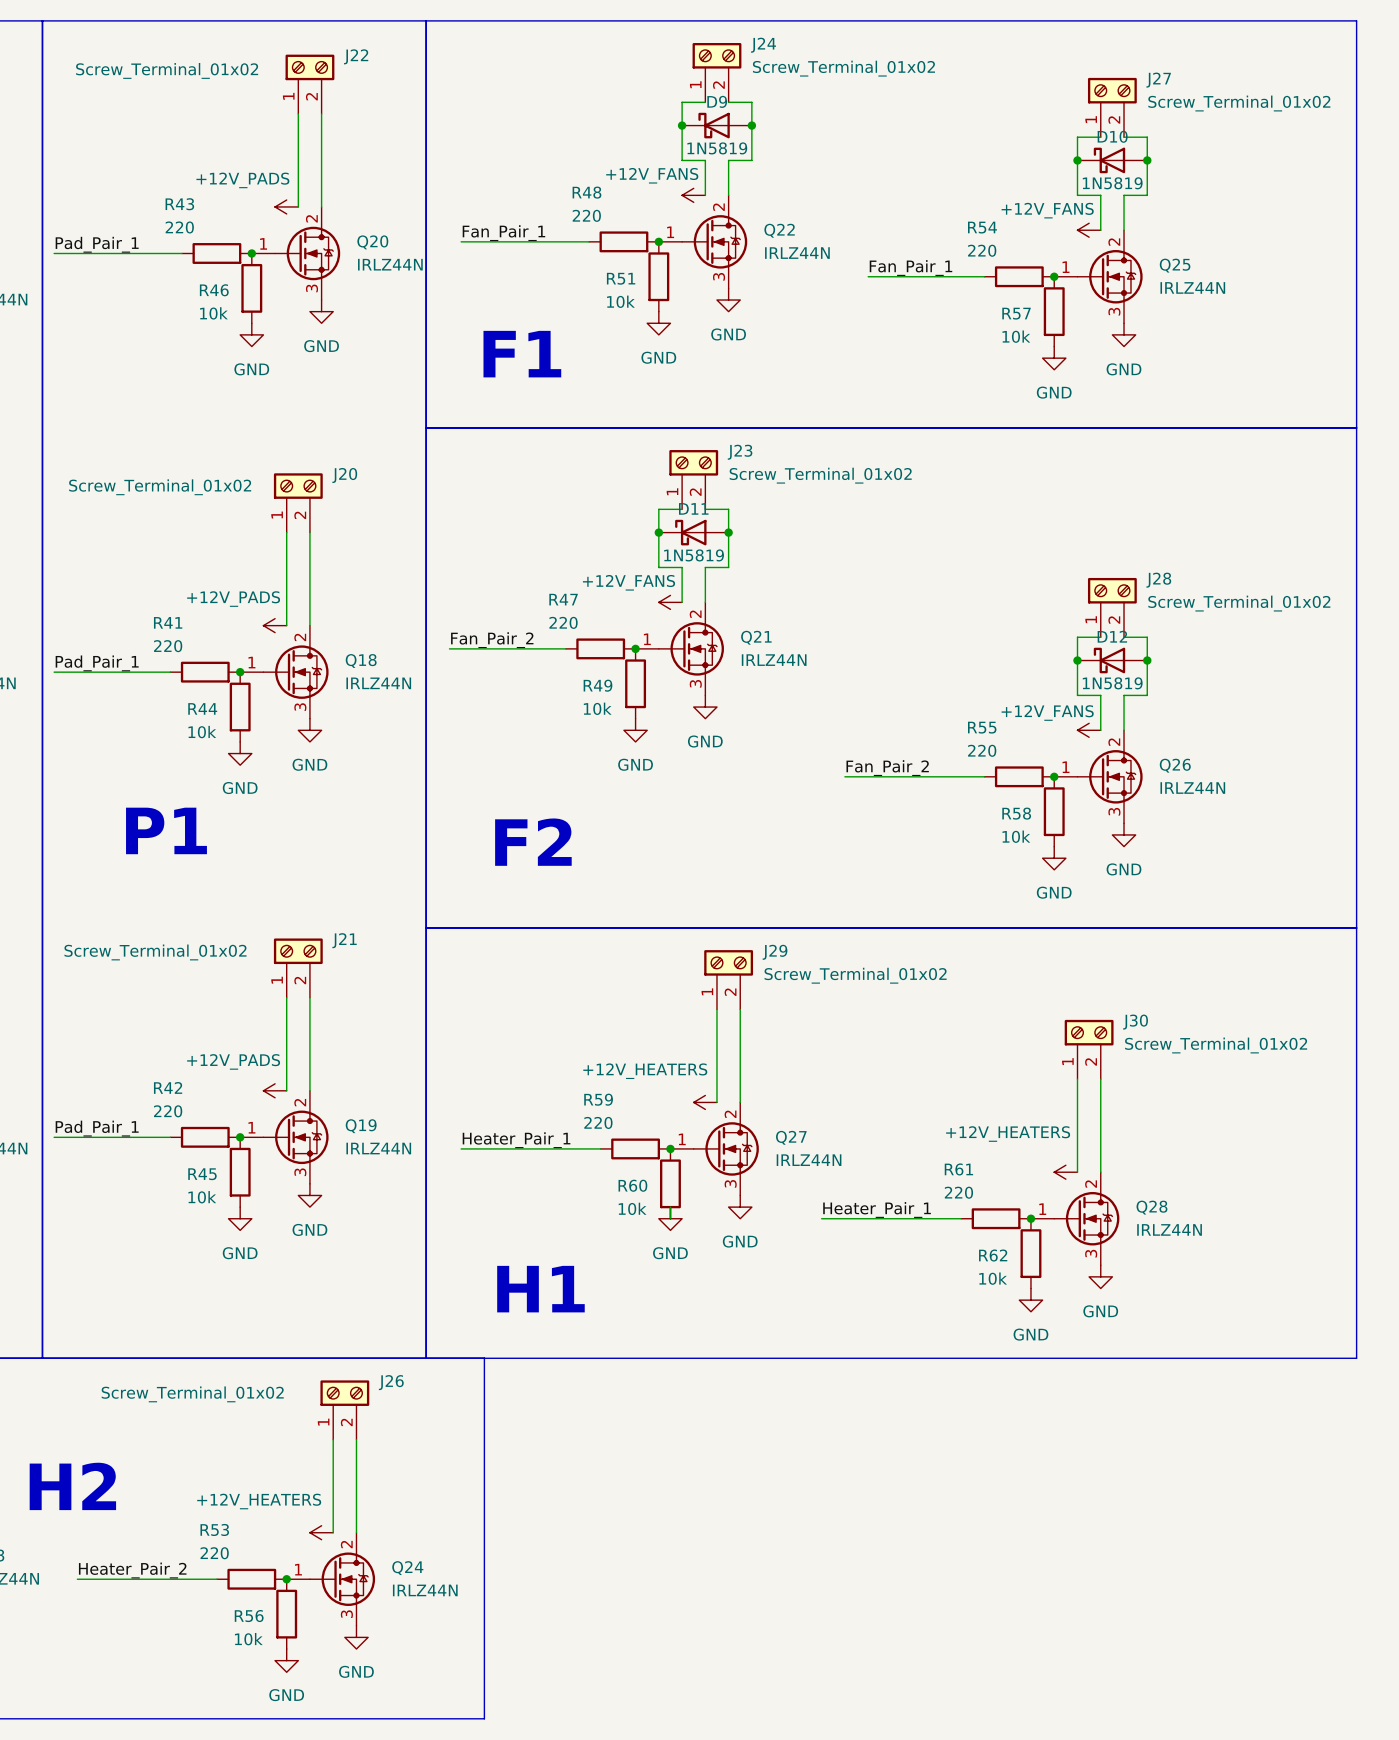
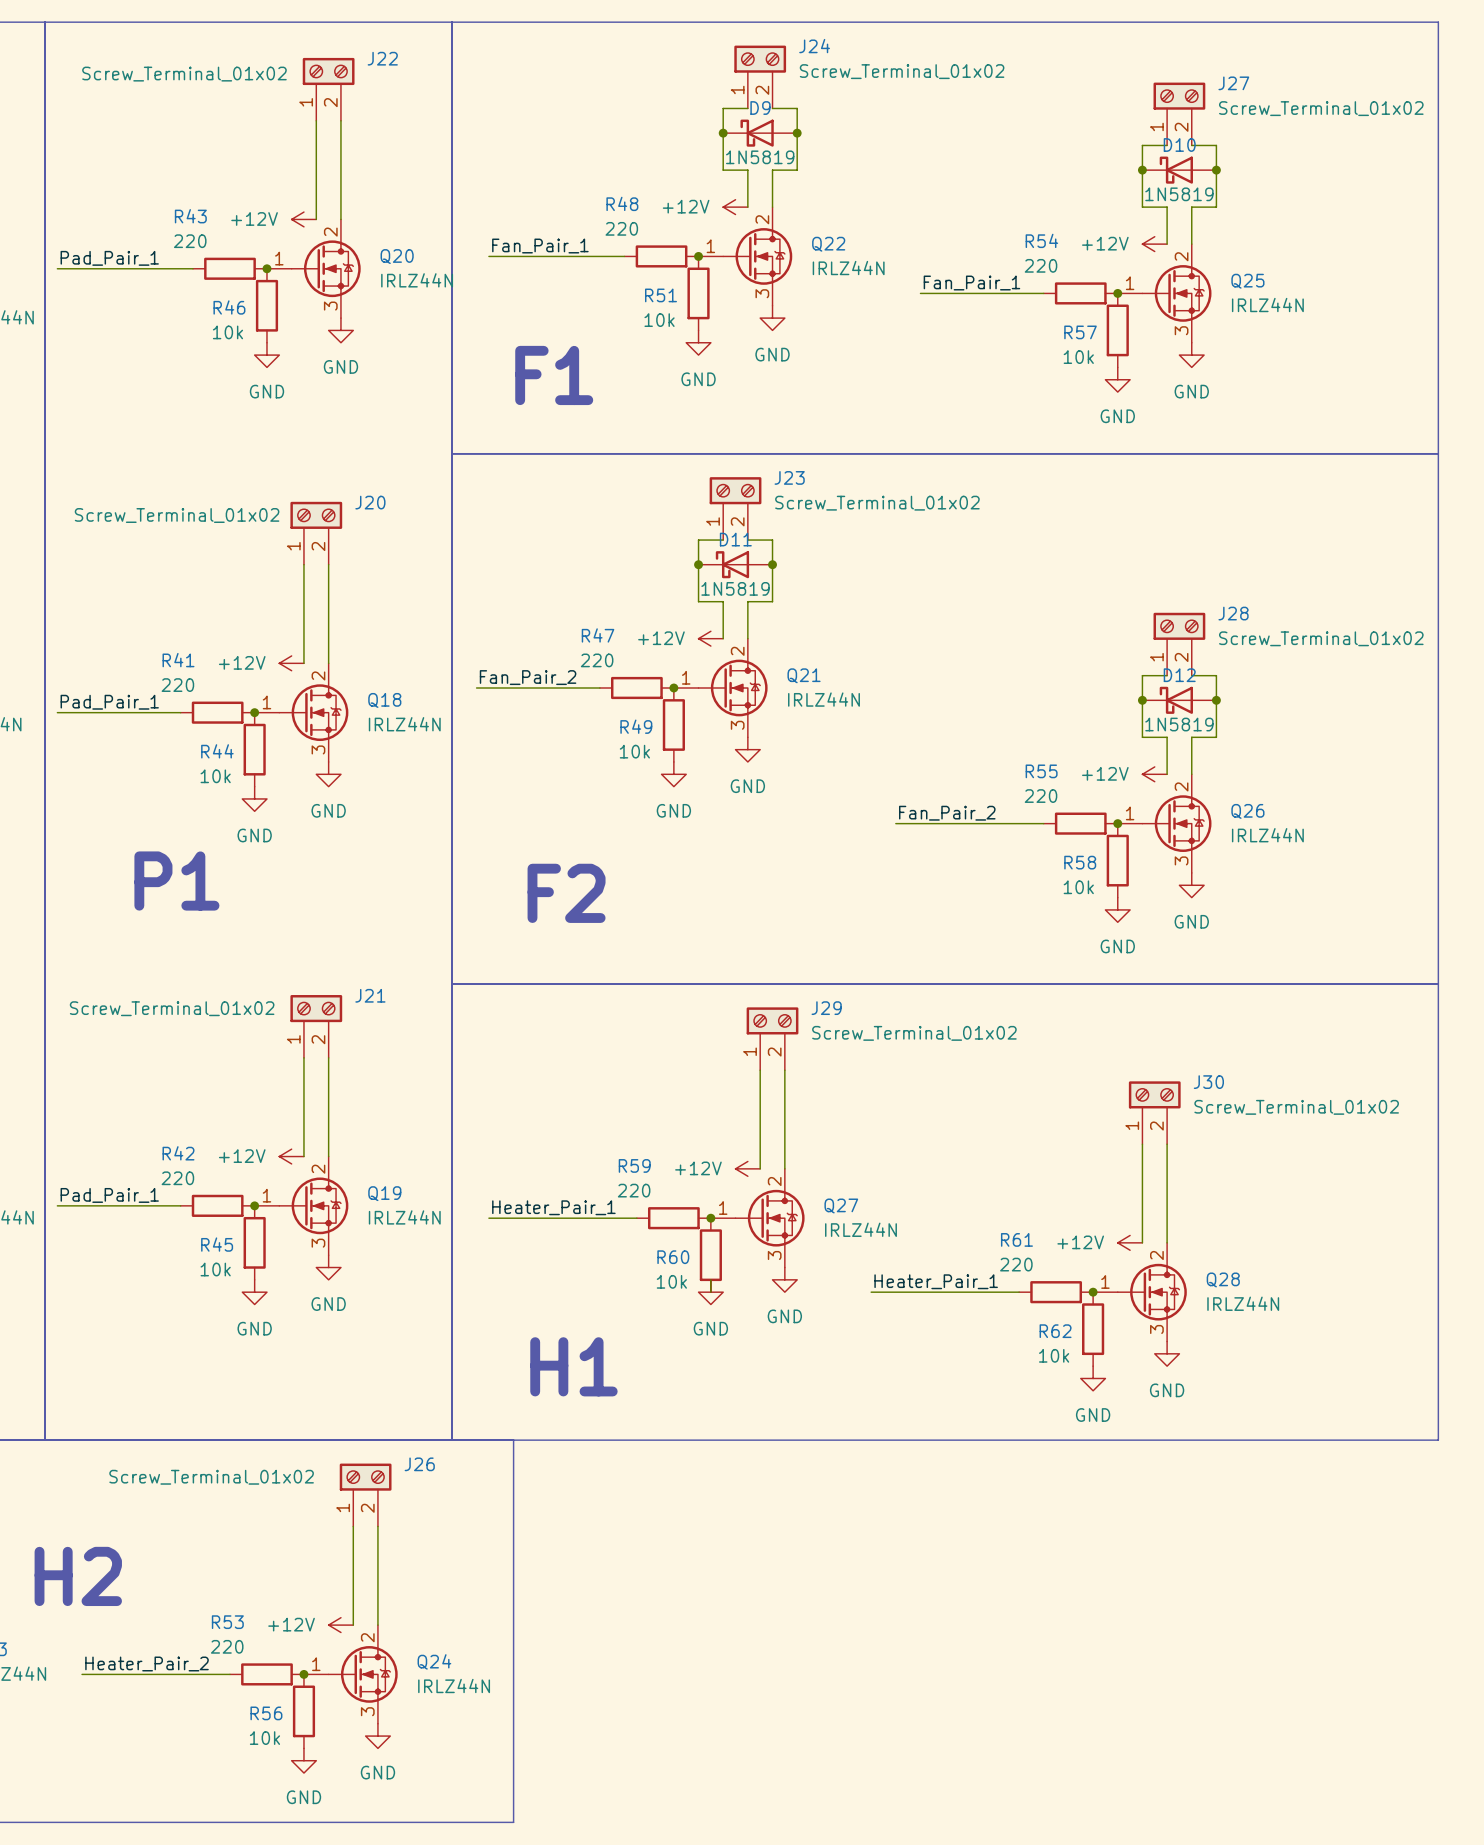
power symbol: +12V_FANS (693, 195) -> +12V (735, 207)
power symbol: +12V_PADS (286, 206) -> +12V (303, 219)
power symbol: +12V_FANS (1089, 230) -> +12V (1154, 244)
power symbol: +12V_FANS (670, 602) -> +12V (710, 638)
power symbol: +12V_PADS (275, 625) -> +12V (291, 663)
power symbol: +12V_FANS (1089, 730) -> +12V (1154, 774)
power symbol: +12V_PADS (275, 1090) -> +12V (291, 1156)
power symbol: +12V_HEATERS (705, 1102) -> +12V (747, 1168)
power symbol: +12V_HEATERS (1065, 1172) -> +12V (1130, 1242)
power symbol: +12V_HEATERS (321, 1532) -> +12V (340, 1625)

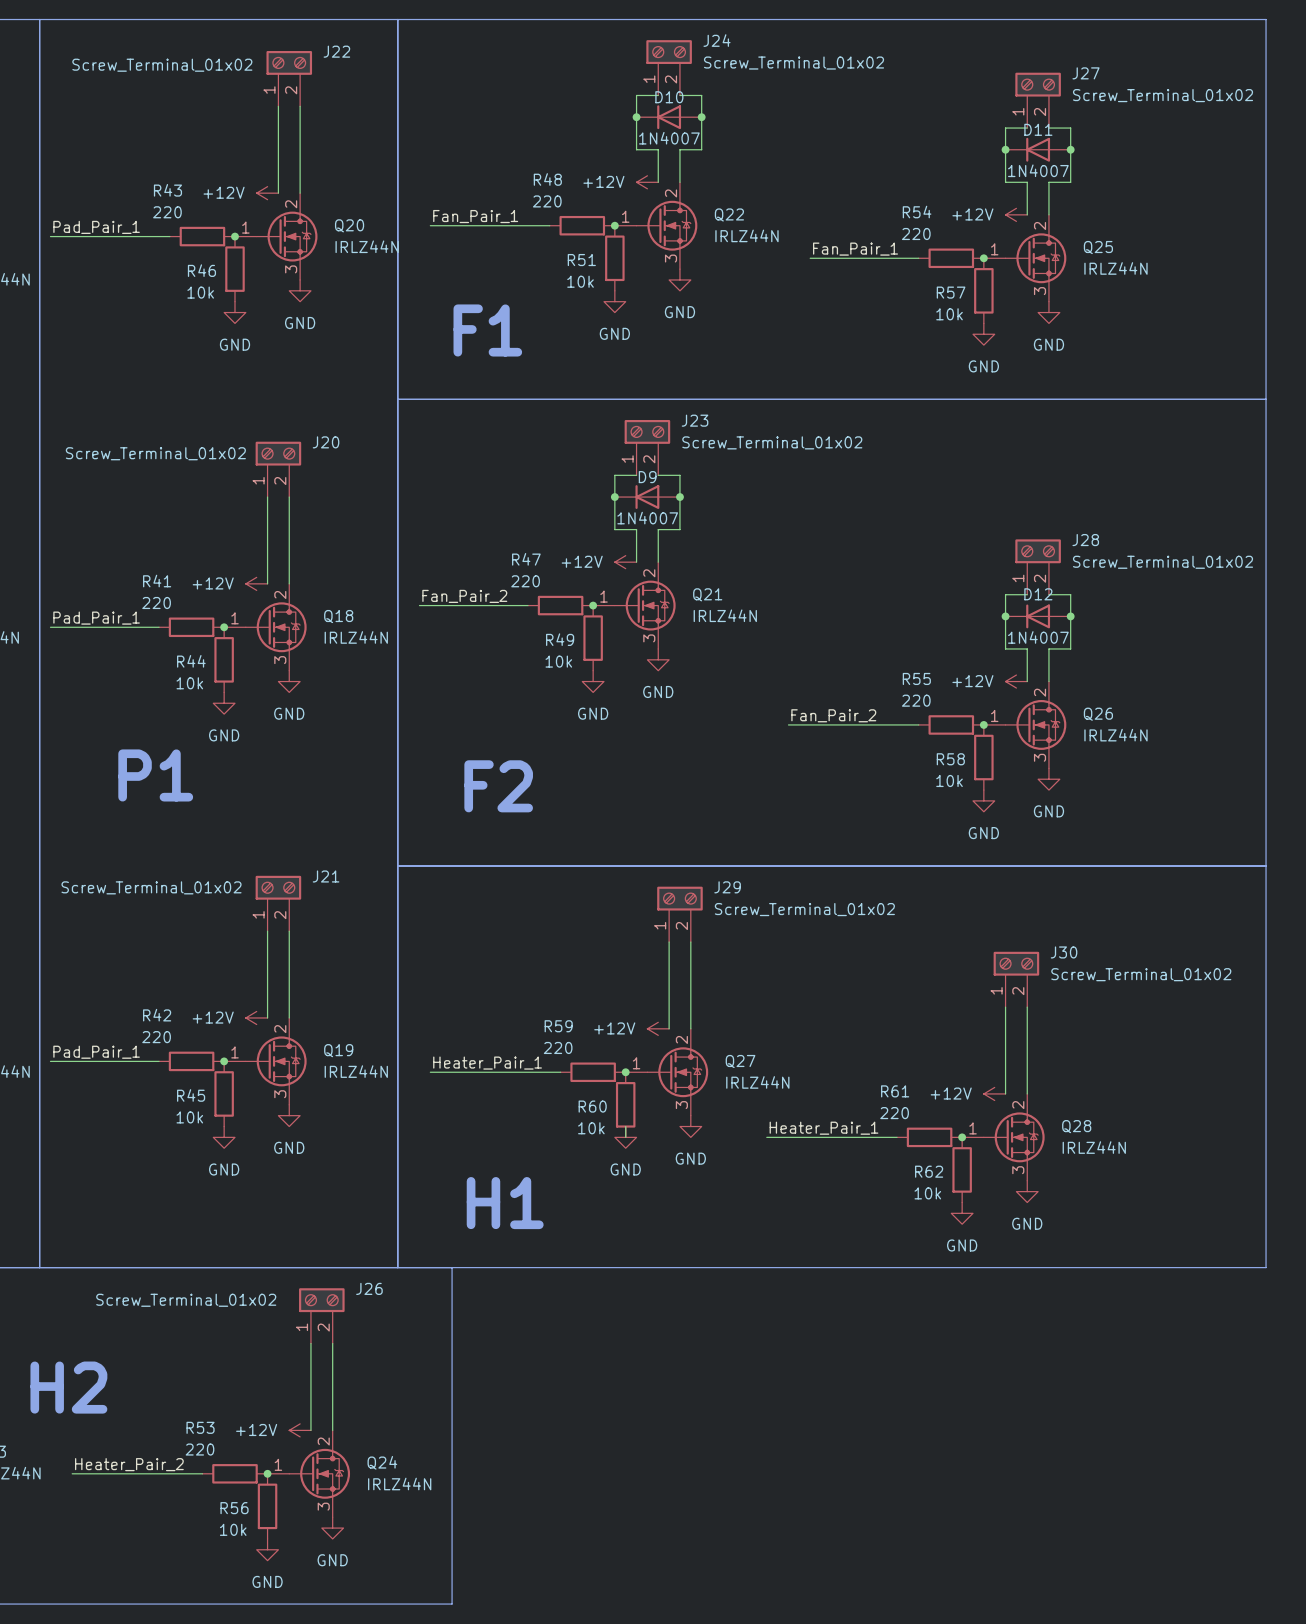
D9 symbol: [723, 119, 798, 147] -> [614, 485, 680, 509]
D10 symbol: [1142, 156, 1217, 184] -> [636, 105, 702, 130]
D9 value: 1N5819 (760, 157) -> 1N4007 (647, 518)
D10 value: 1N5819 (1179, 194) -> 1N4007 (669, 138)
D11 symbol: [698, 551, 773, 579] -> [1005, 137, 1071, 162]
D11 value: 1N5819 (735, 588) -> 1N4007 (1038, 170)
D12 symbol: [1142, 686, 1217, 714] -> [1005, 604, 1071, 629]
D12 value: 1N5819 (1179, 724) -> 1N4007 (1038, 637)

